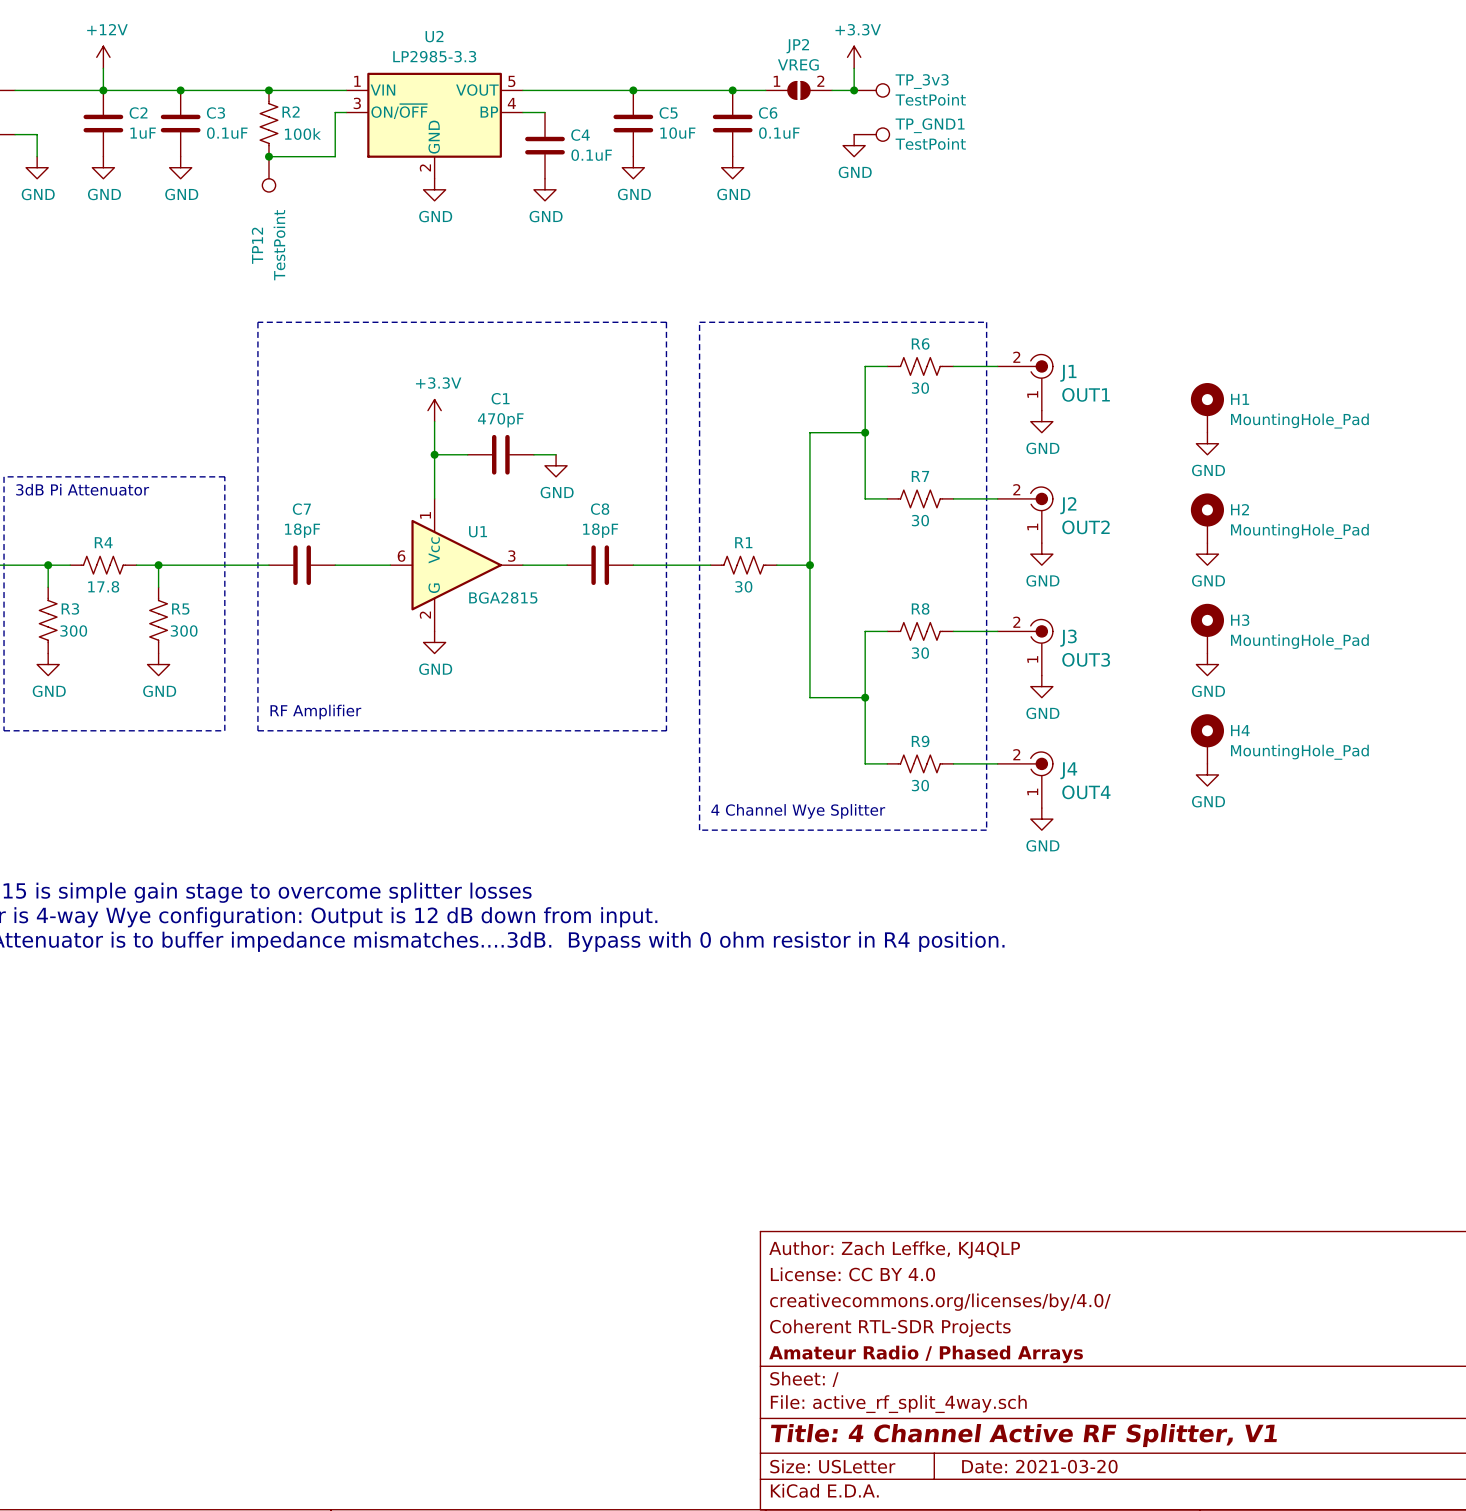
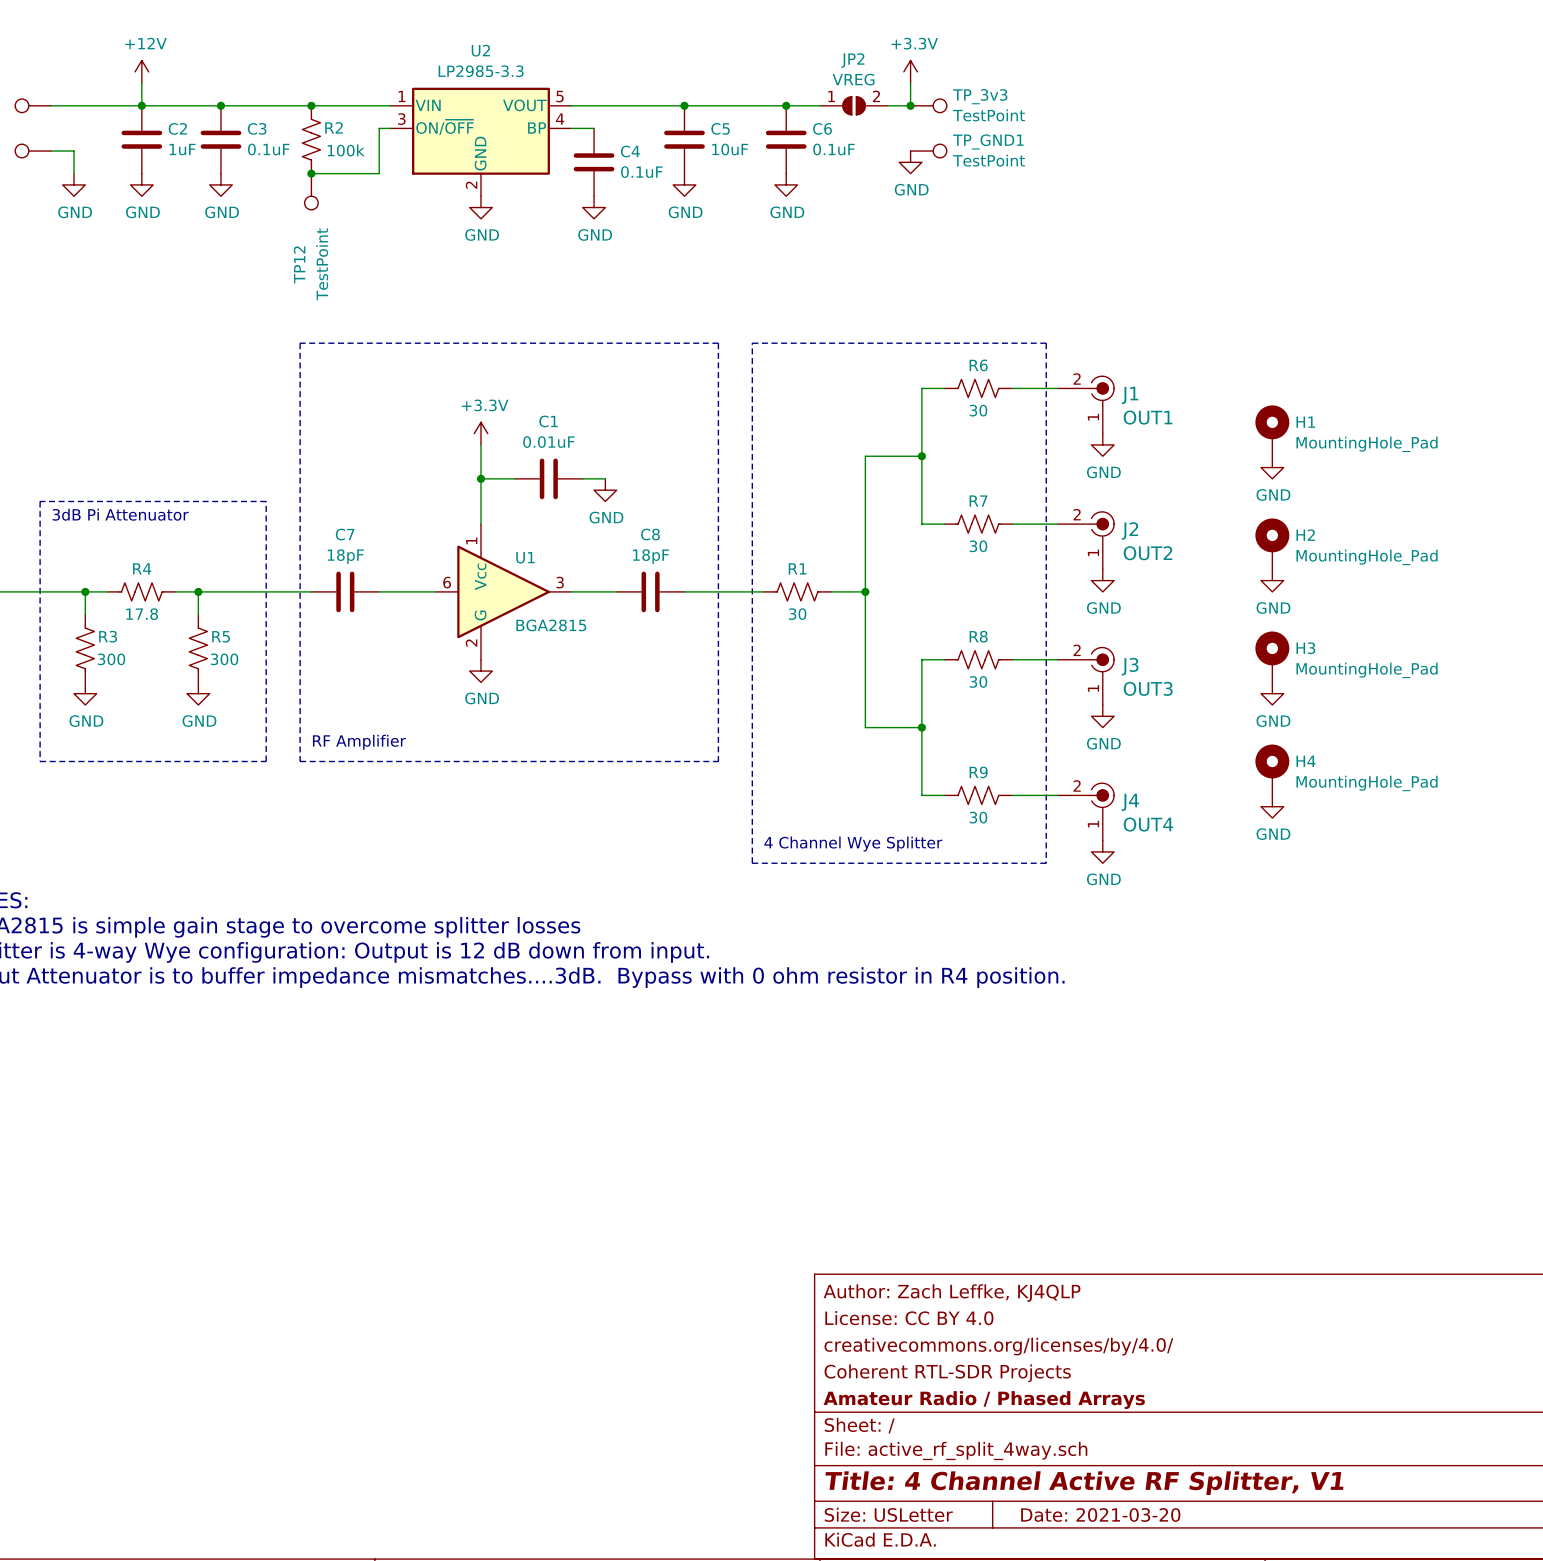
C1 value: 470pF (500, 420) -> 0.01uF (548, 442)

